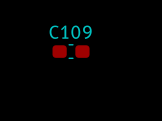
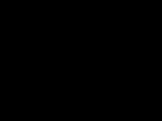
C109: (71, 51) -> none

